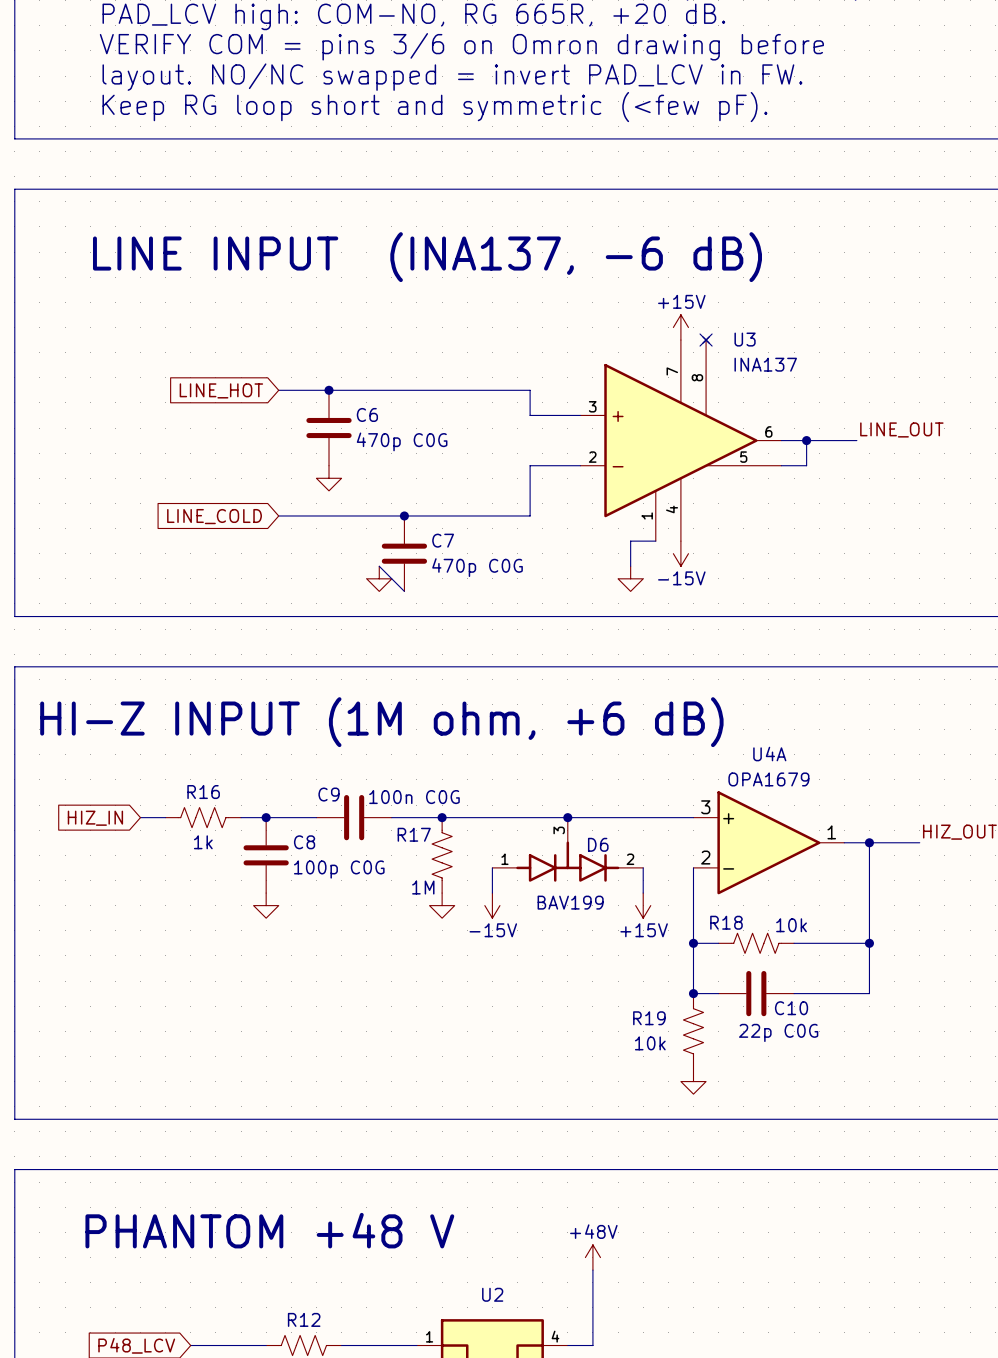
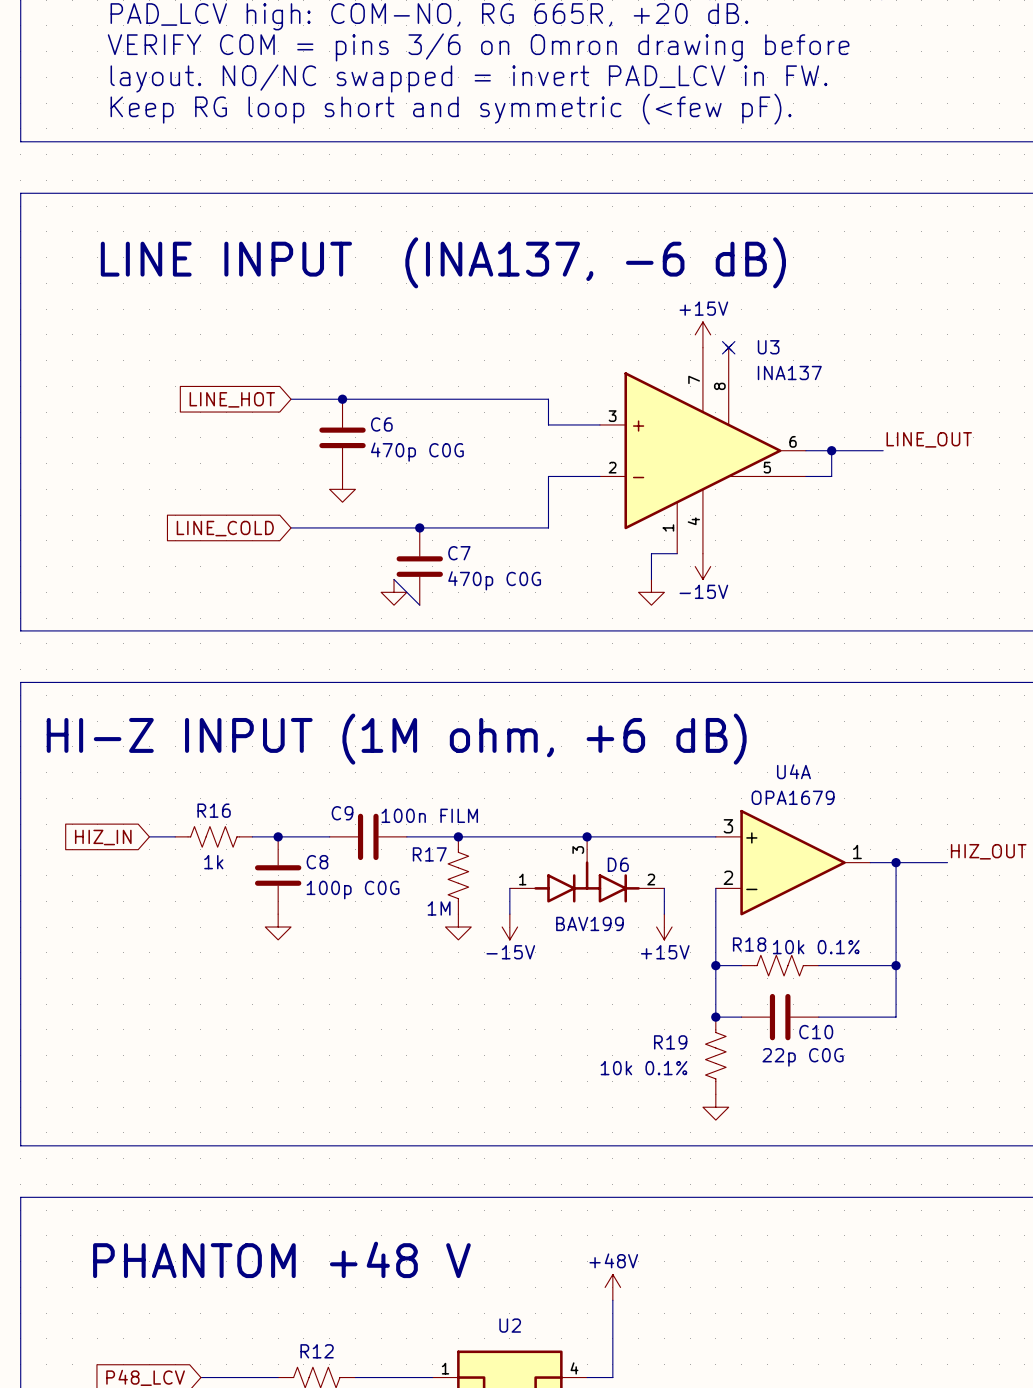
C9 value: 100n C0G (414, 797) -> 100n FILM (429, 815)
R18 value: 10k (791, 925) -> 10k 0.1% (816, 947)
R19 value: 10k (650, 1043) -> 10k 0.1% (644, 1068)

